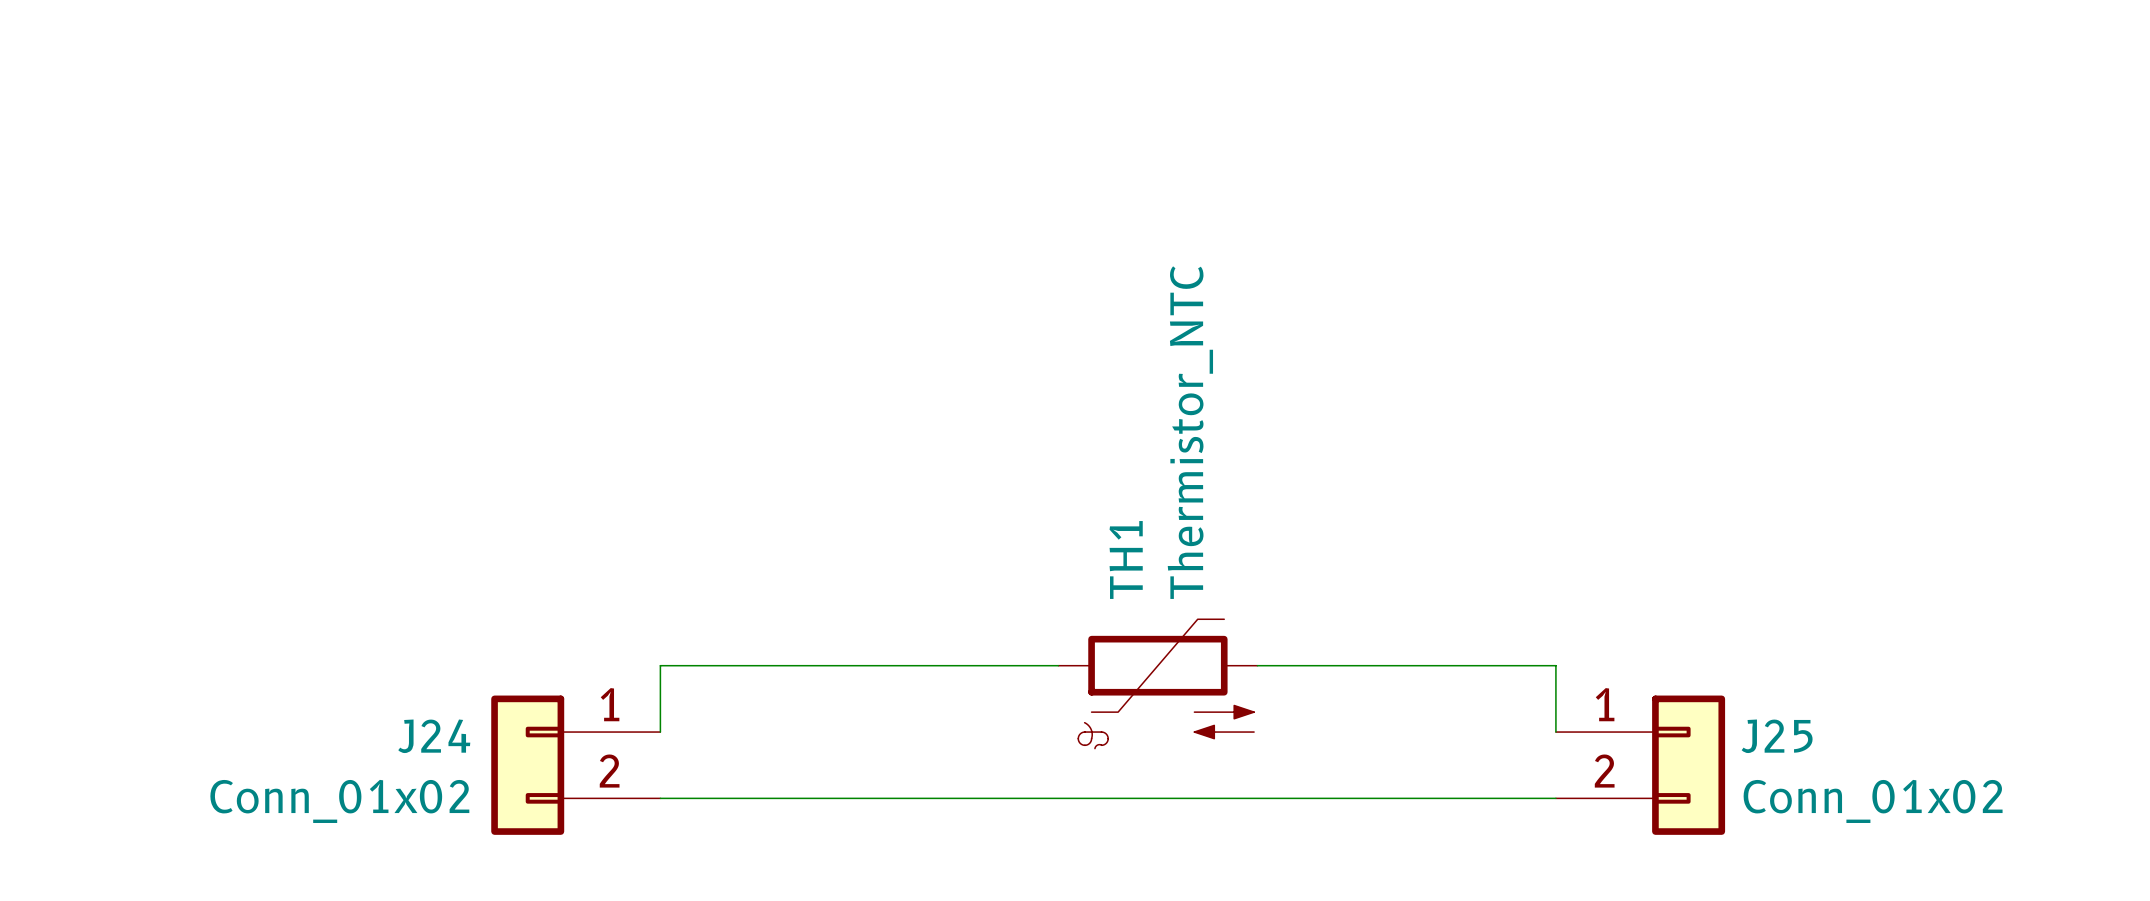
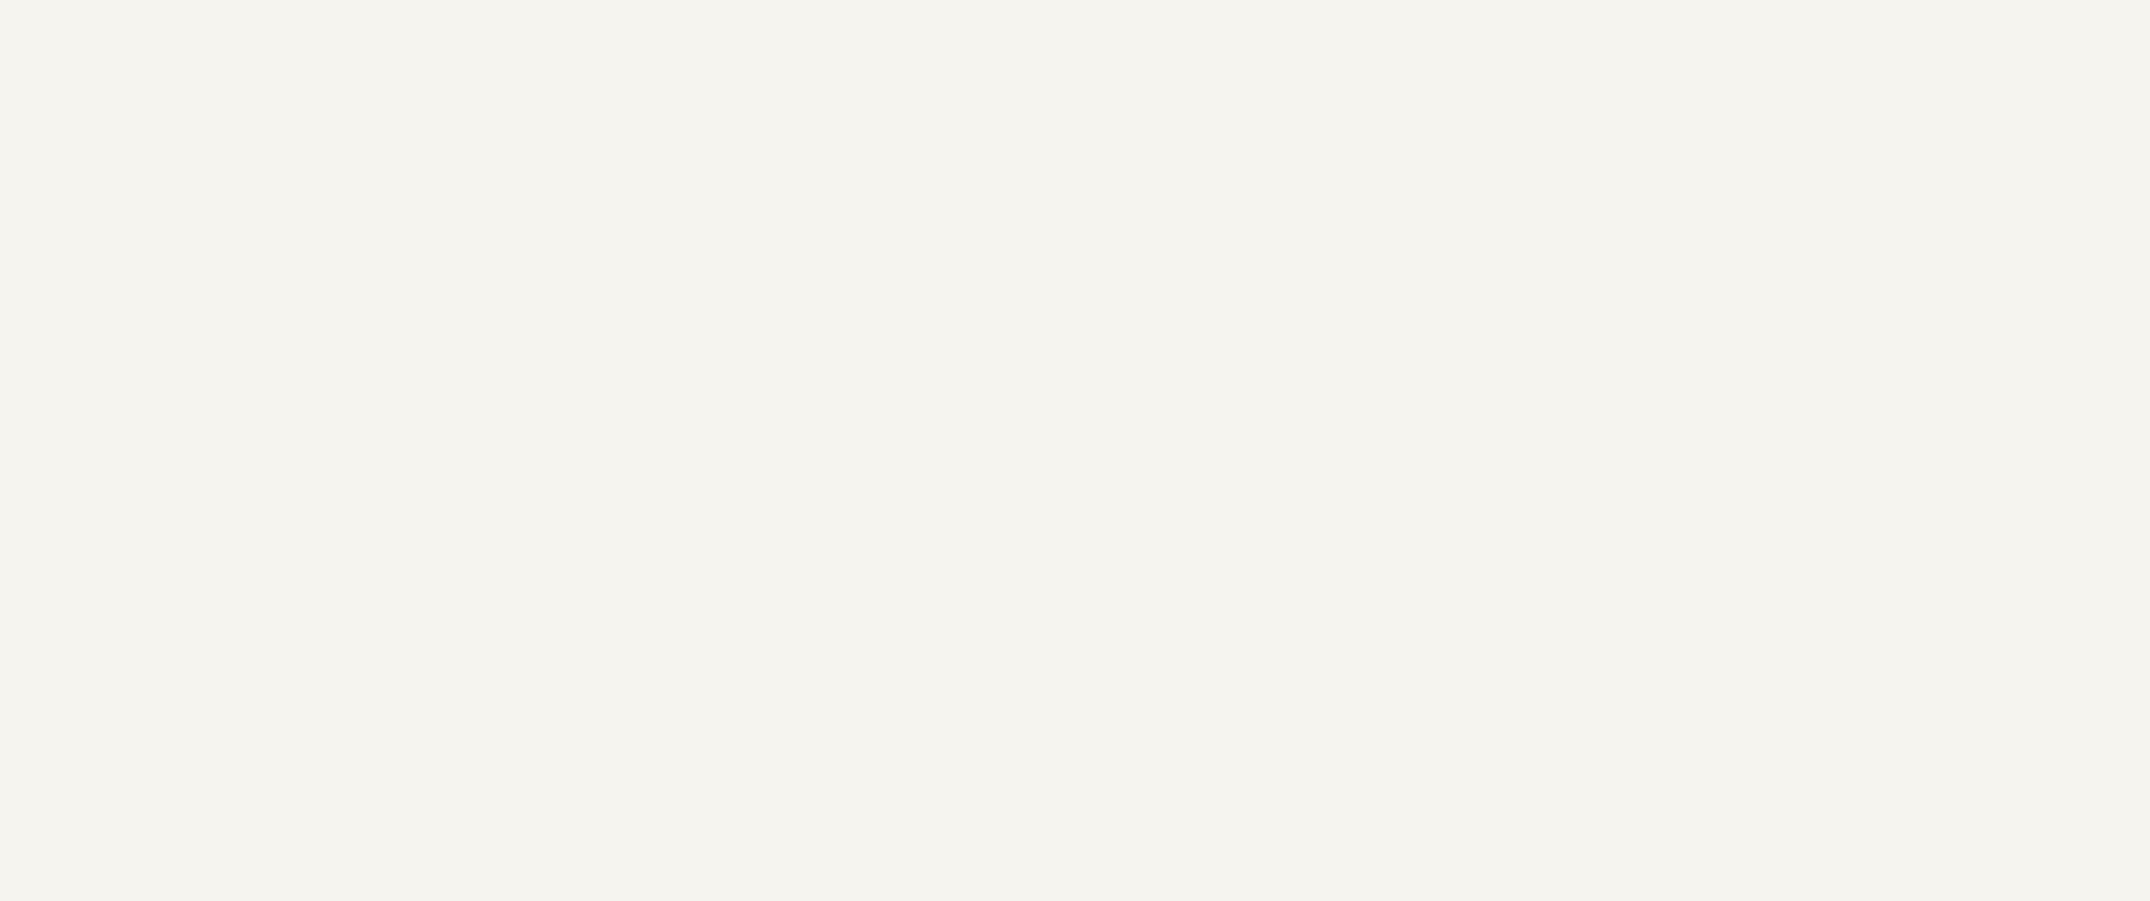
wire: (1058, 665) (660, 665) (660, 732) -> none
wire: (1257, 665) (1555, 665) (1555, 732) -> none
TH1: Thermistor_NTC (1157, 683) -> none
J24: Conn_01x02 (575, 765) -> none
J25: Conn_01x02 (1640, 765) -> none
wire: (660, 798) (1555, 798) -> none

